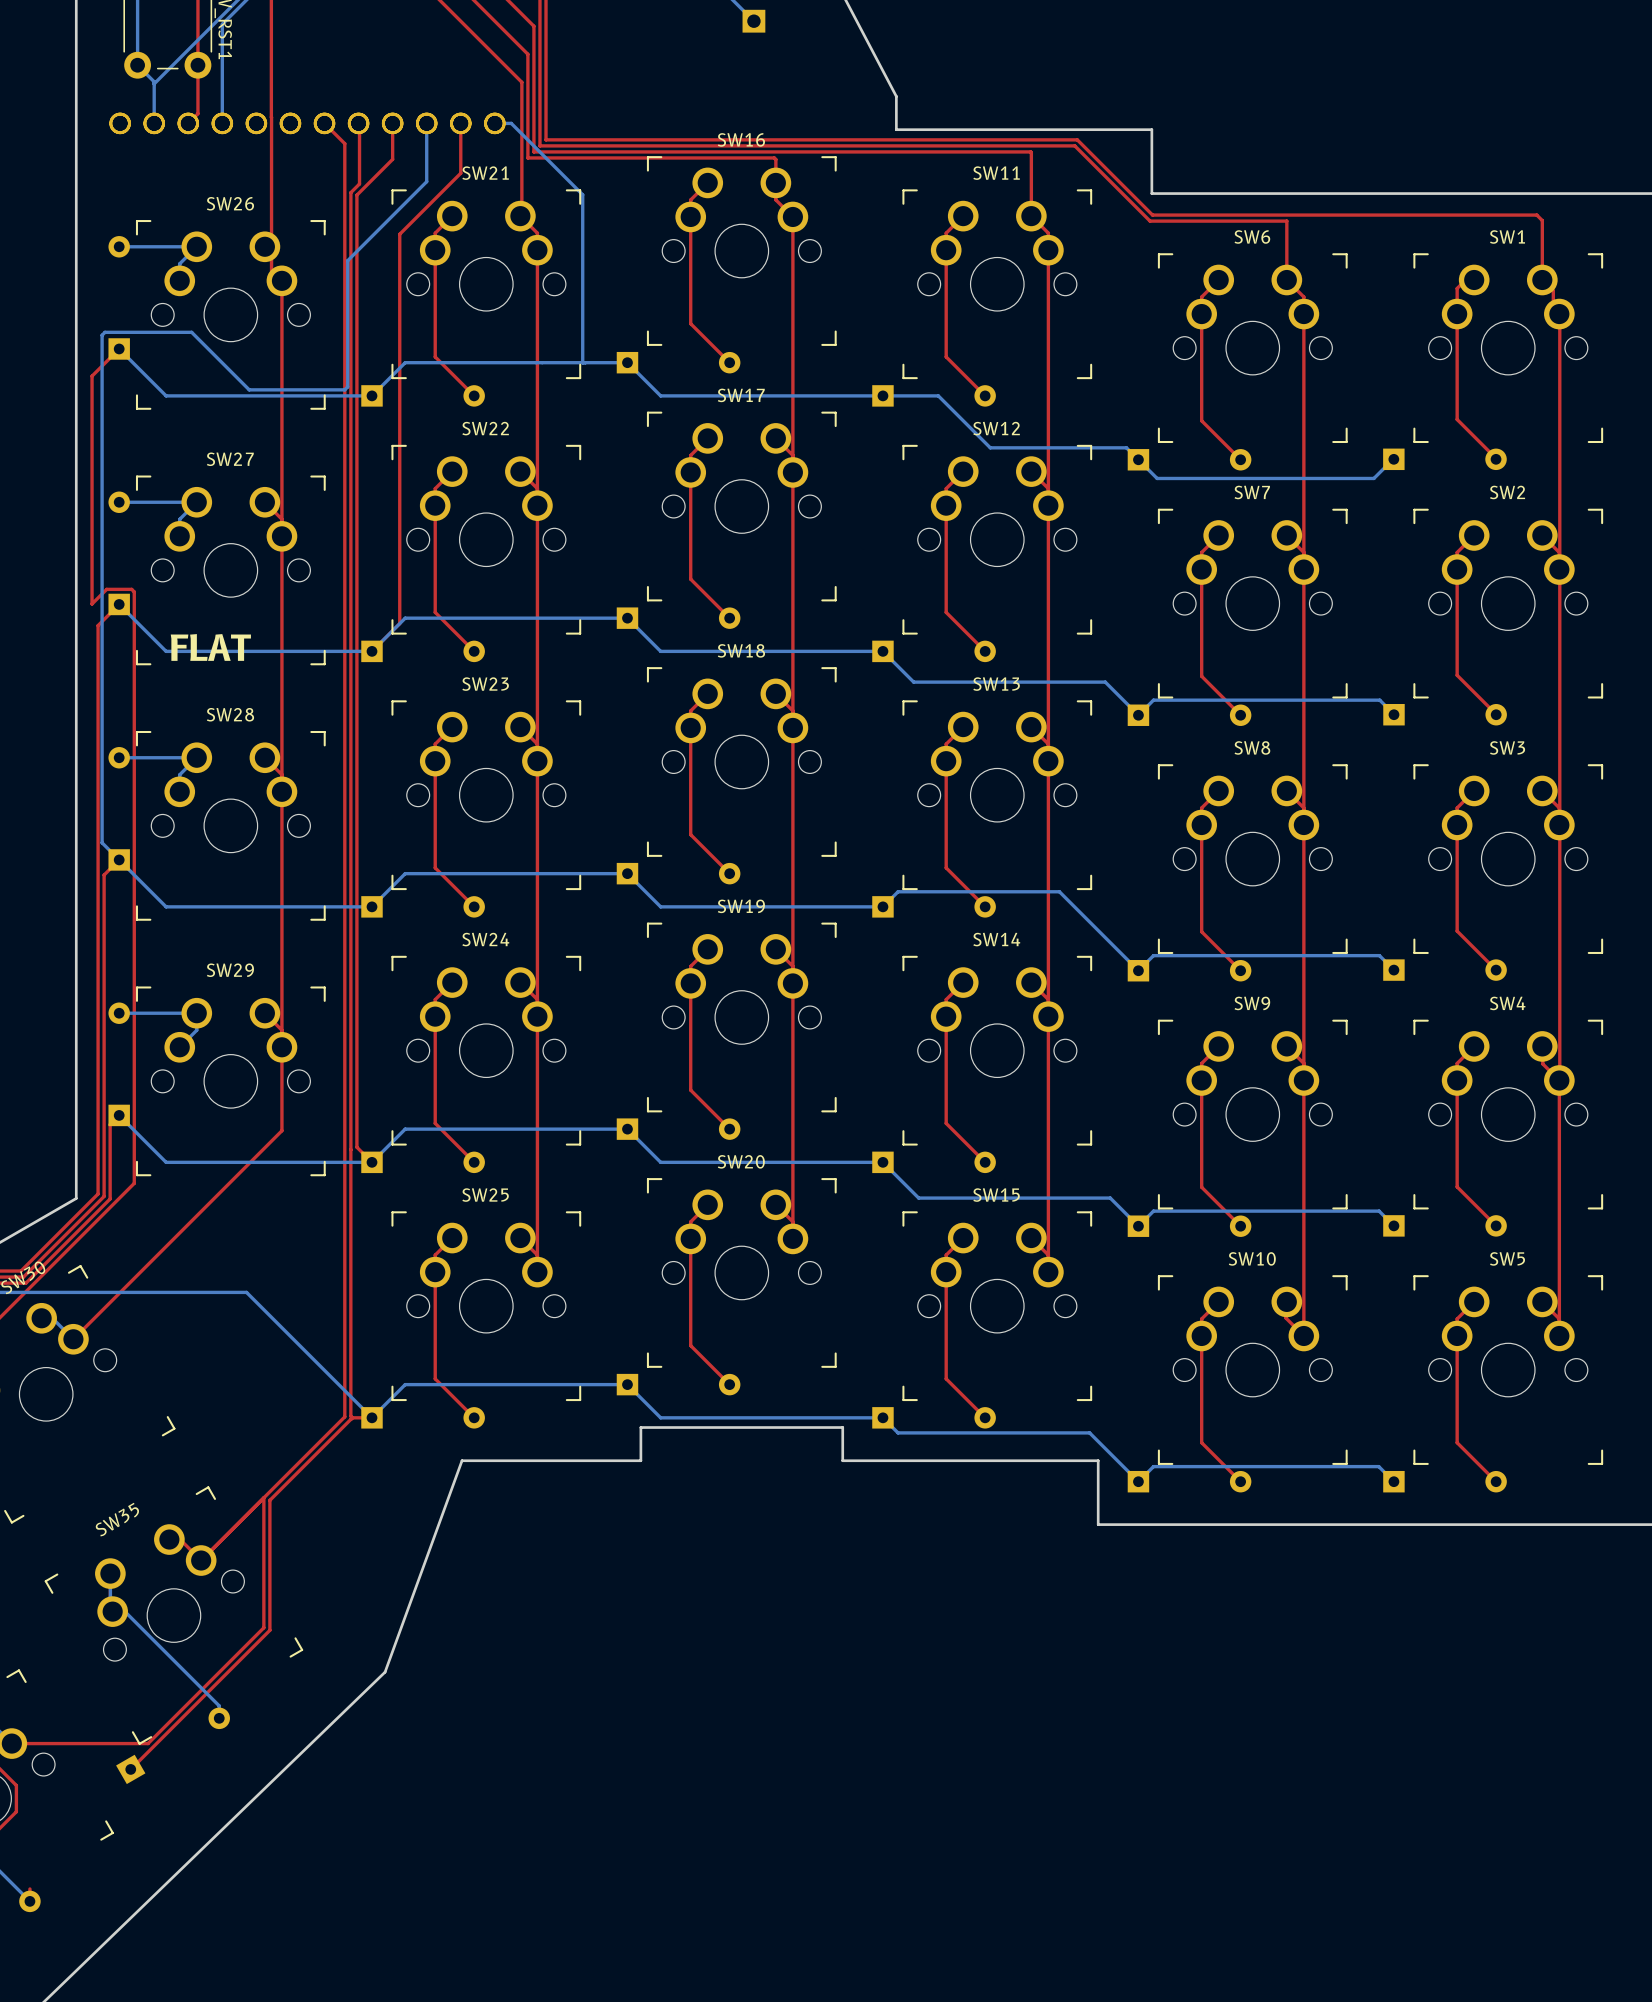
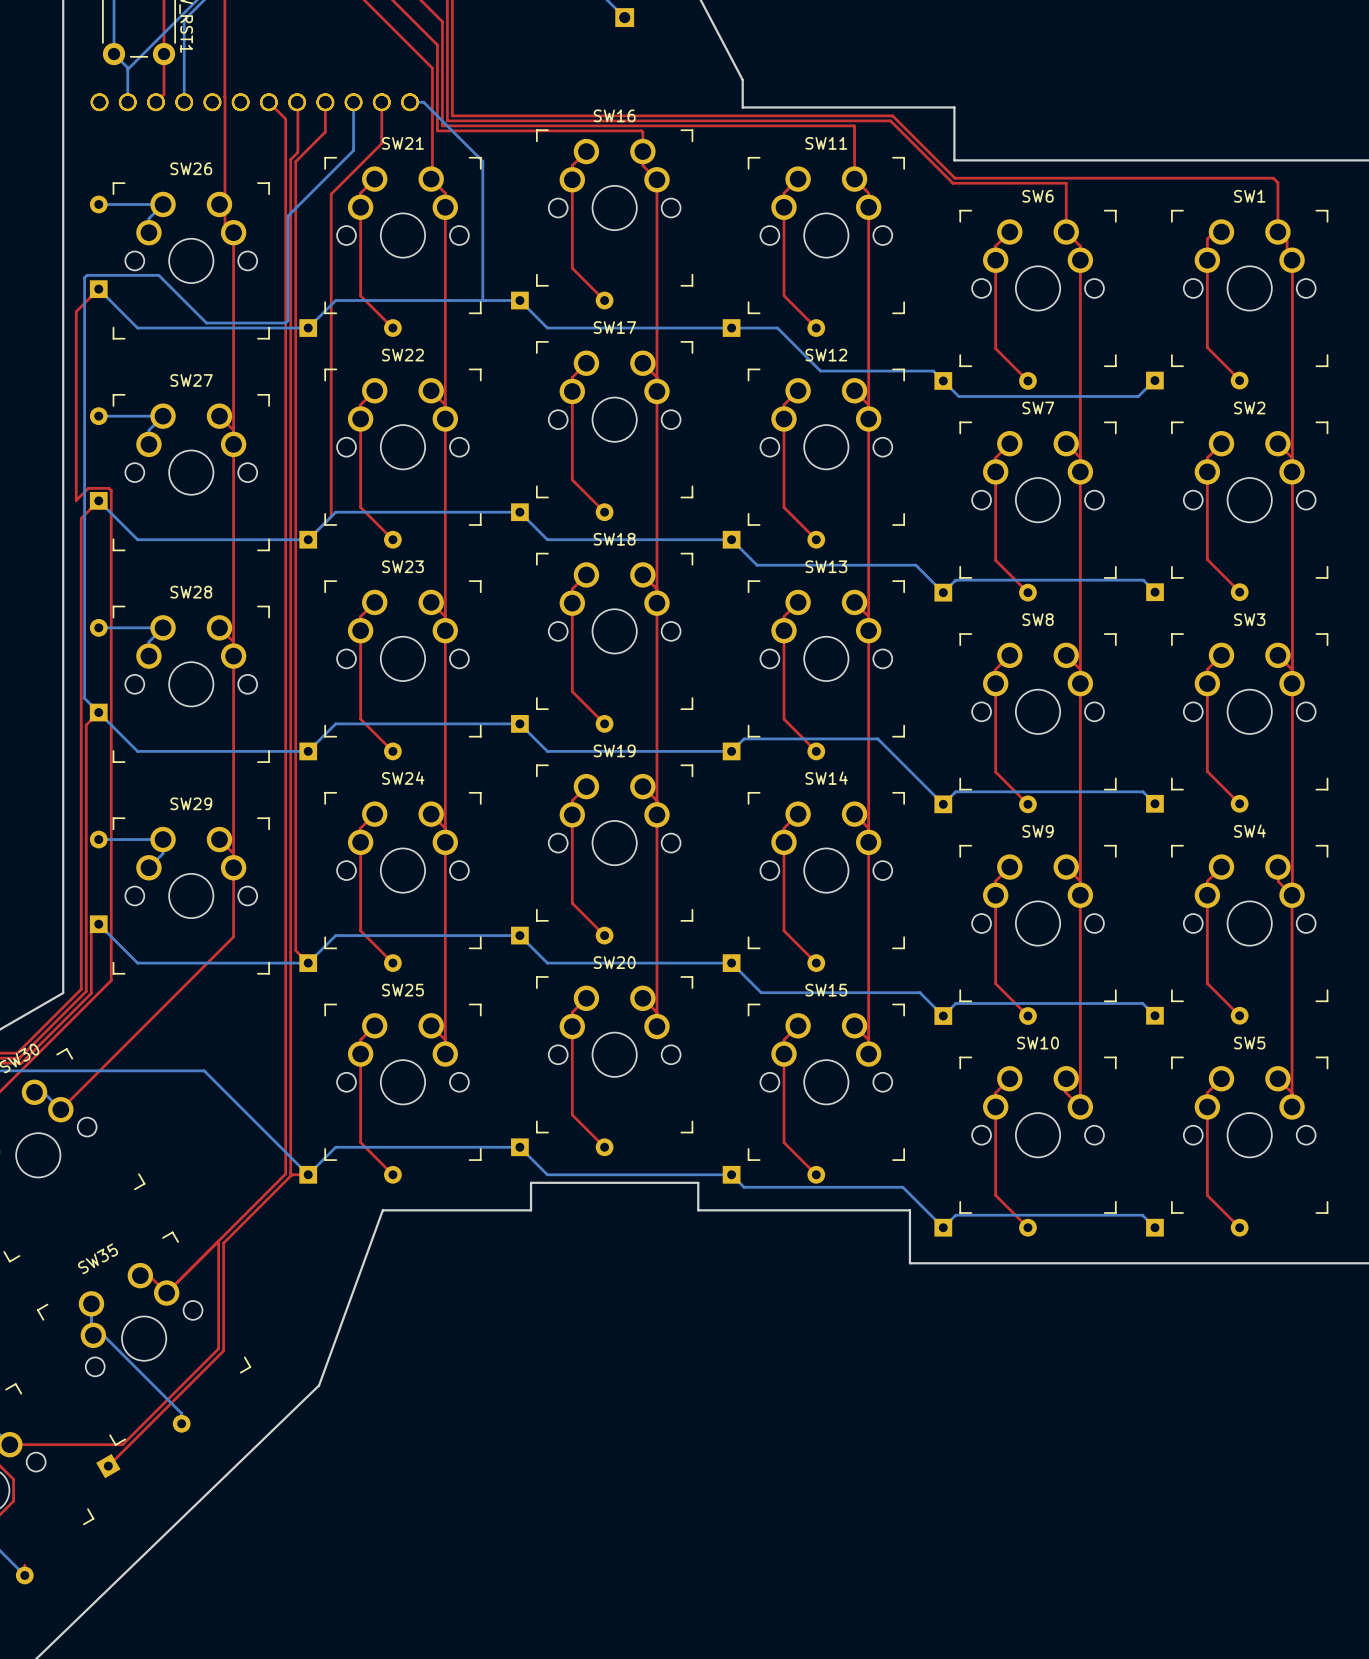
text: FLAT (210, 647) -> none

